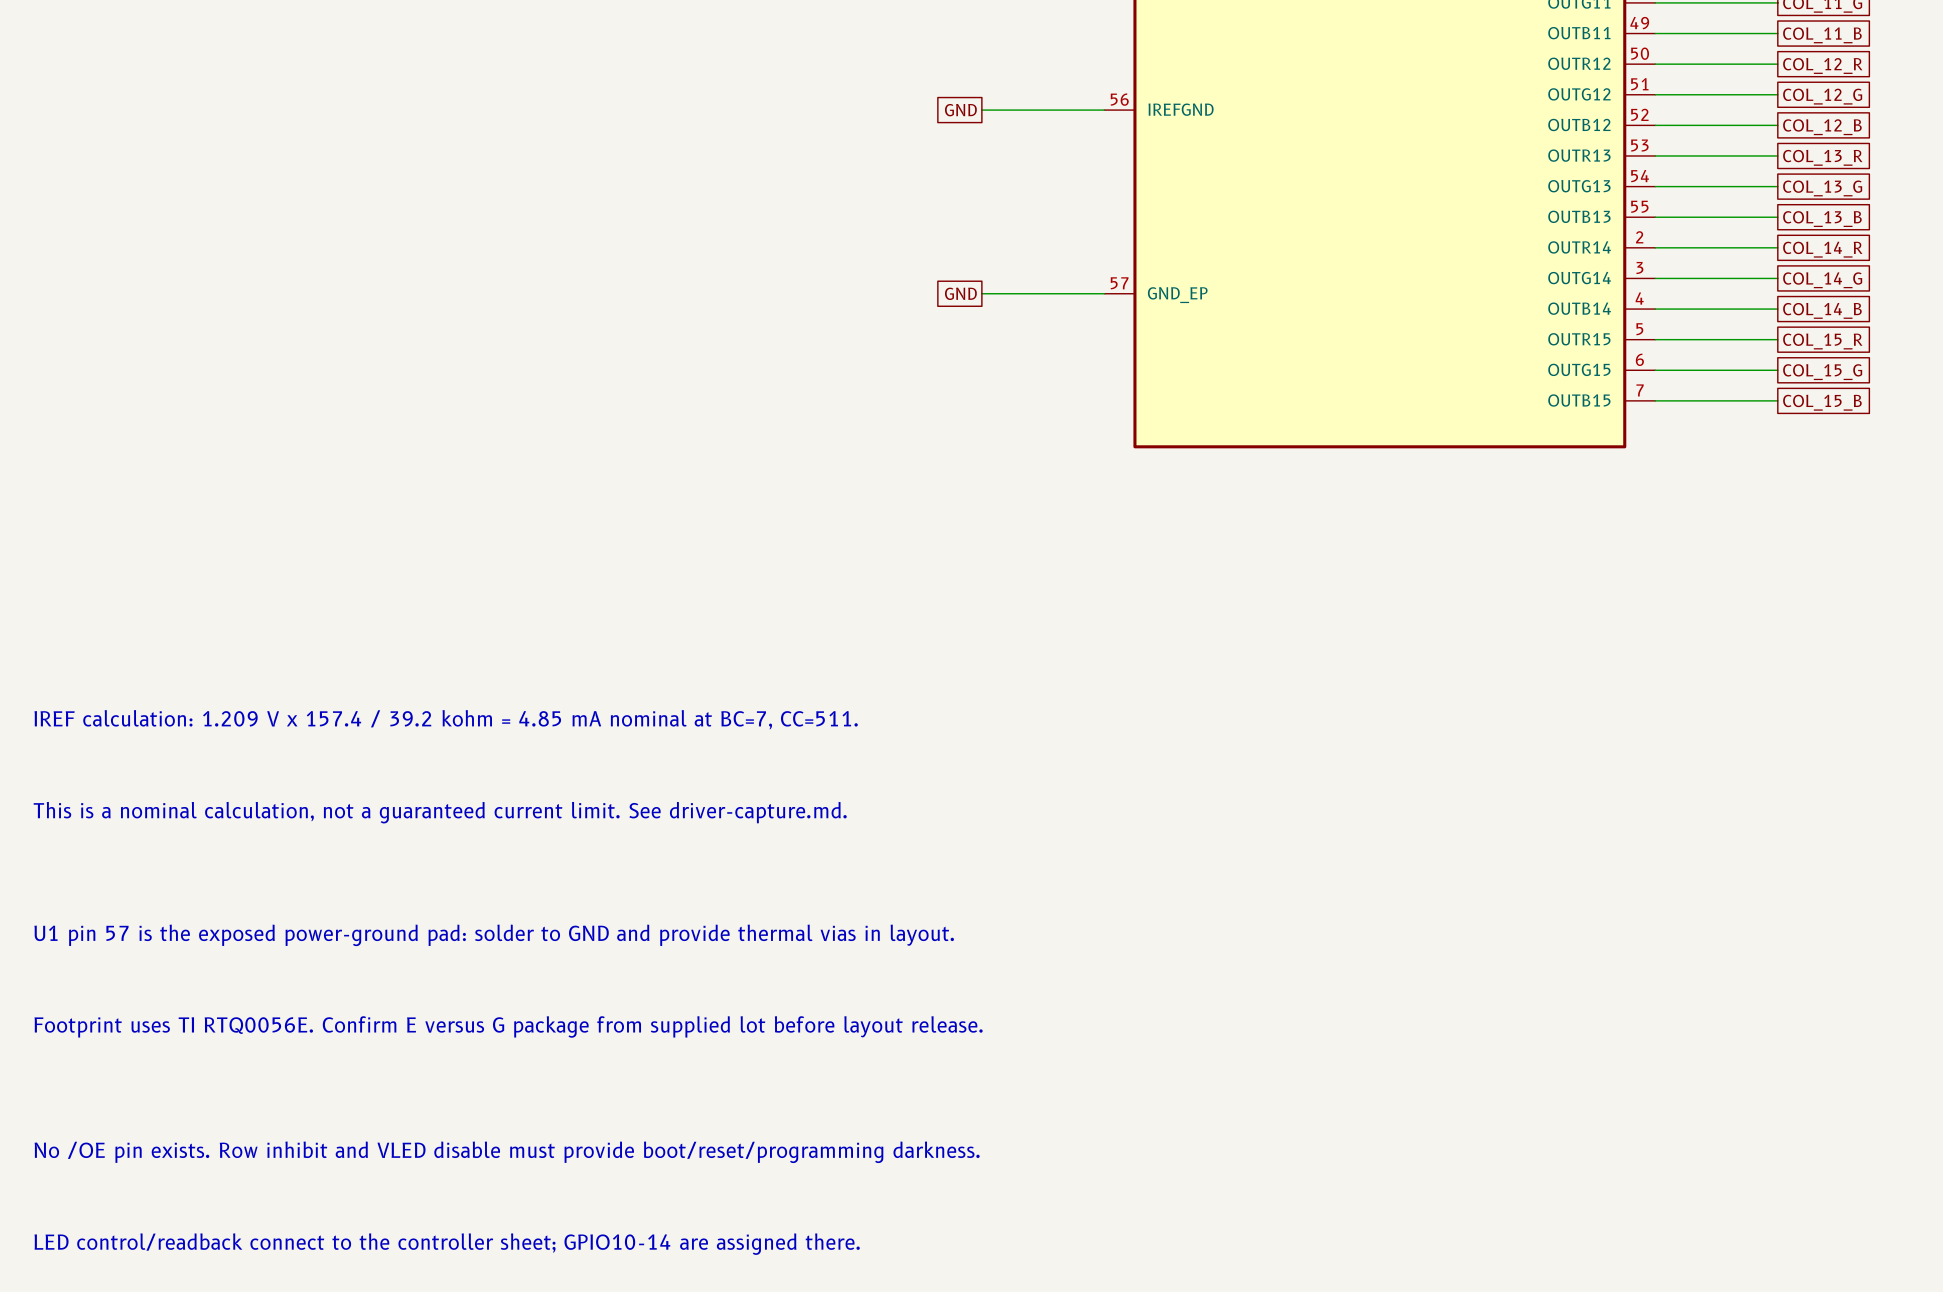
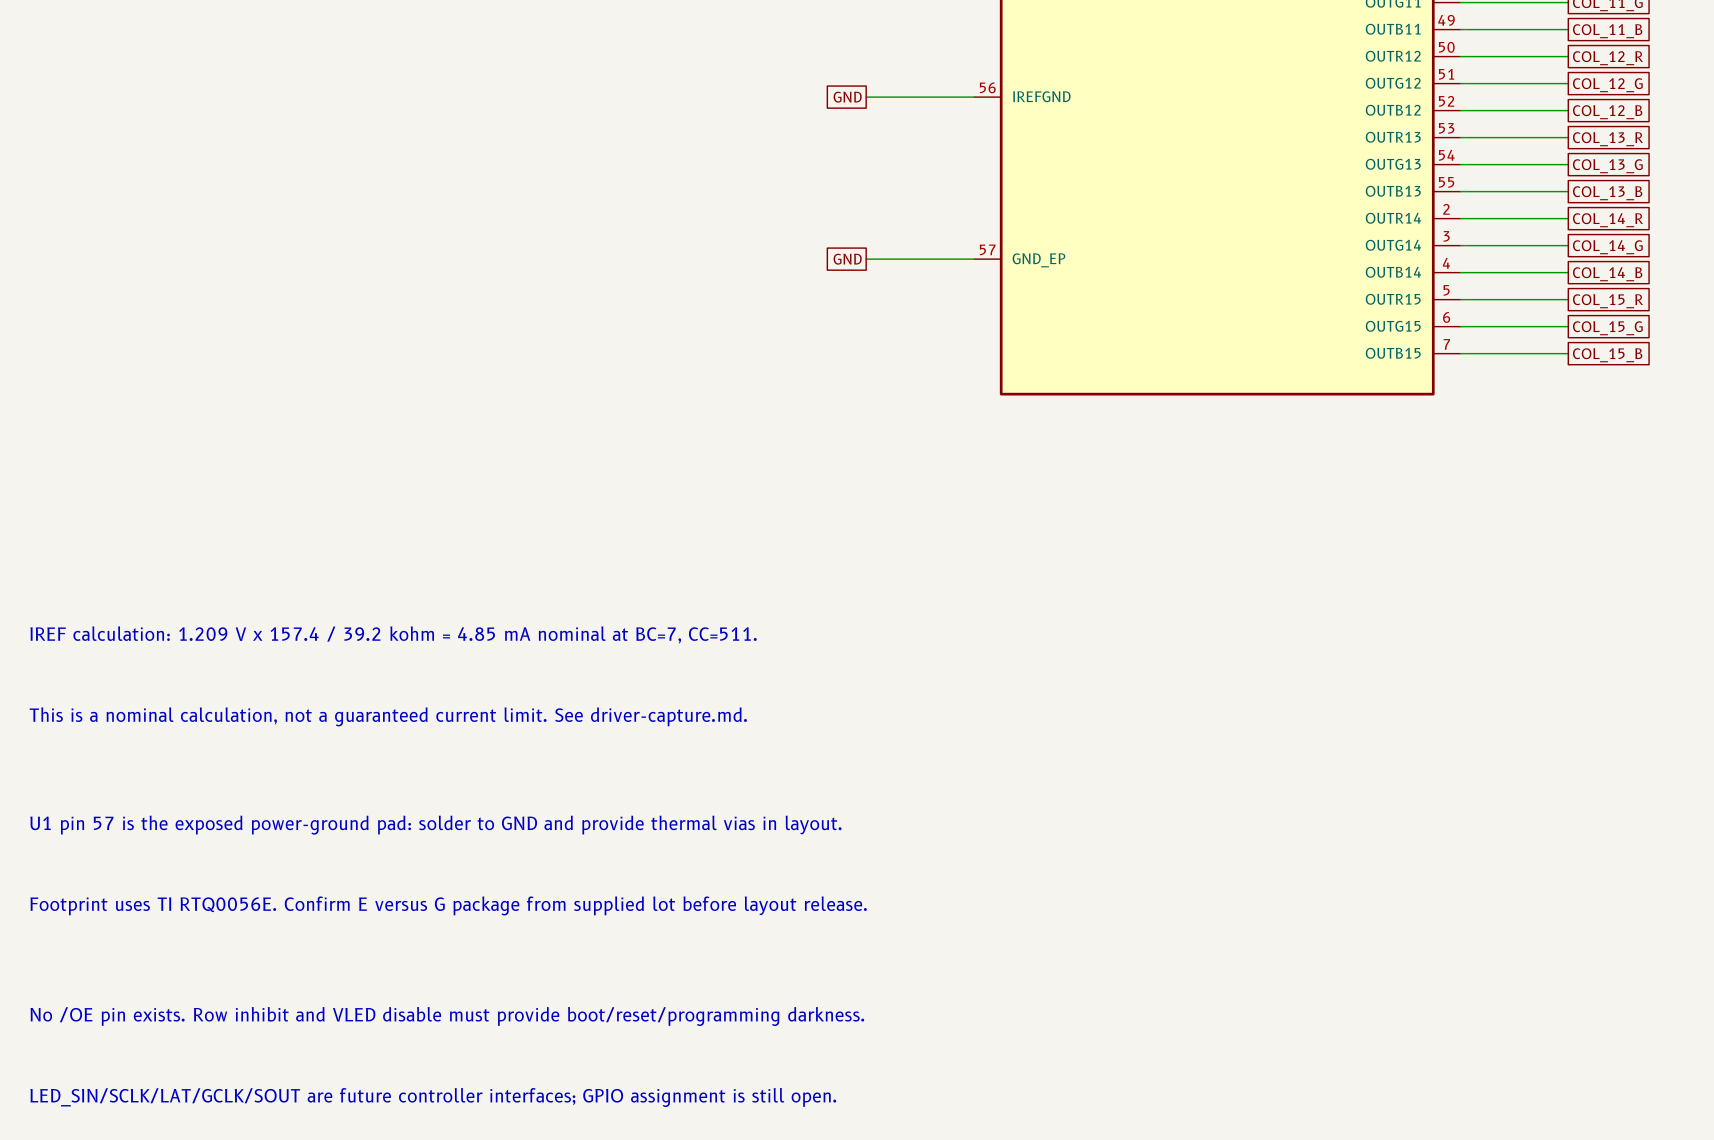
text: LED control/readback connect to the controller sheet; GPIO10-14 are assigned there. (447, 1244) -> LED_SIN/SCLK/LAT/GCLK/SOUT are future controller interfaces; GPIO assignment is still open. (433, 1097)

